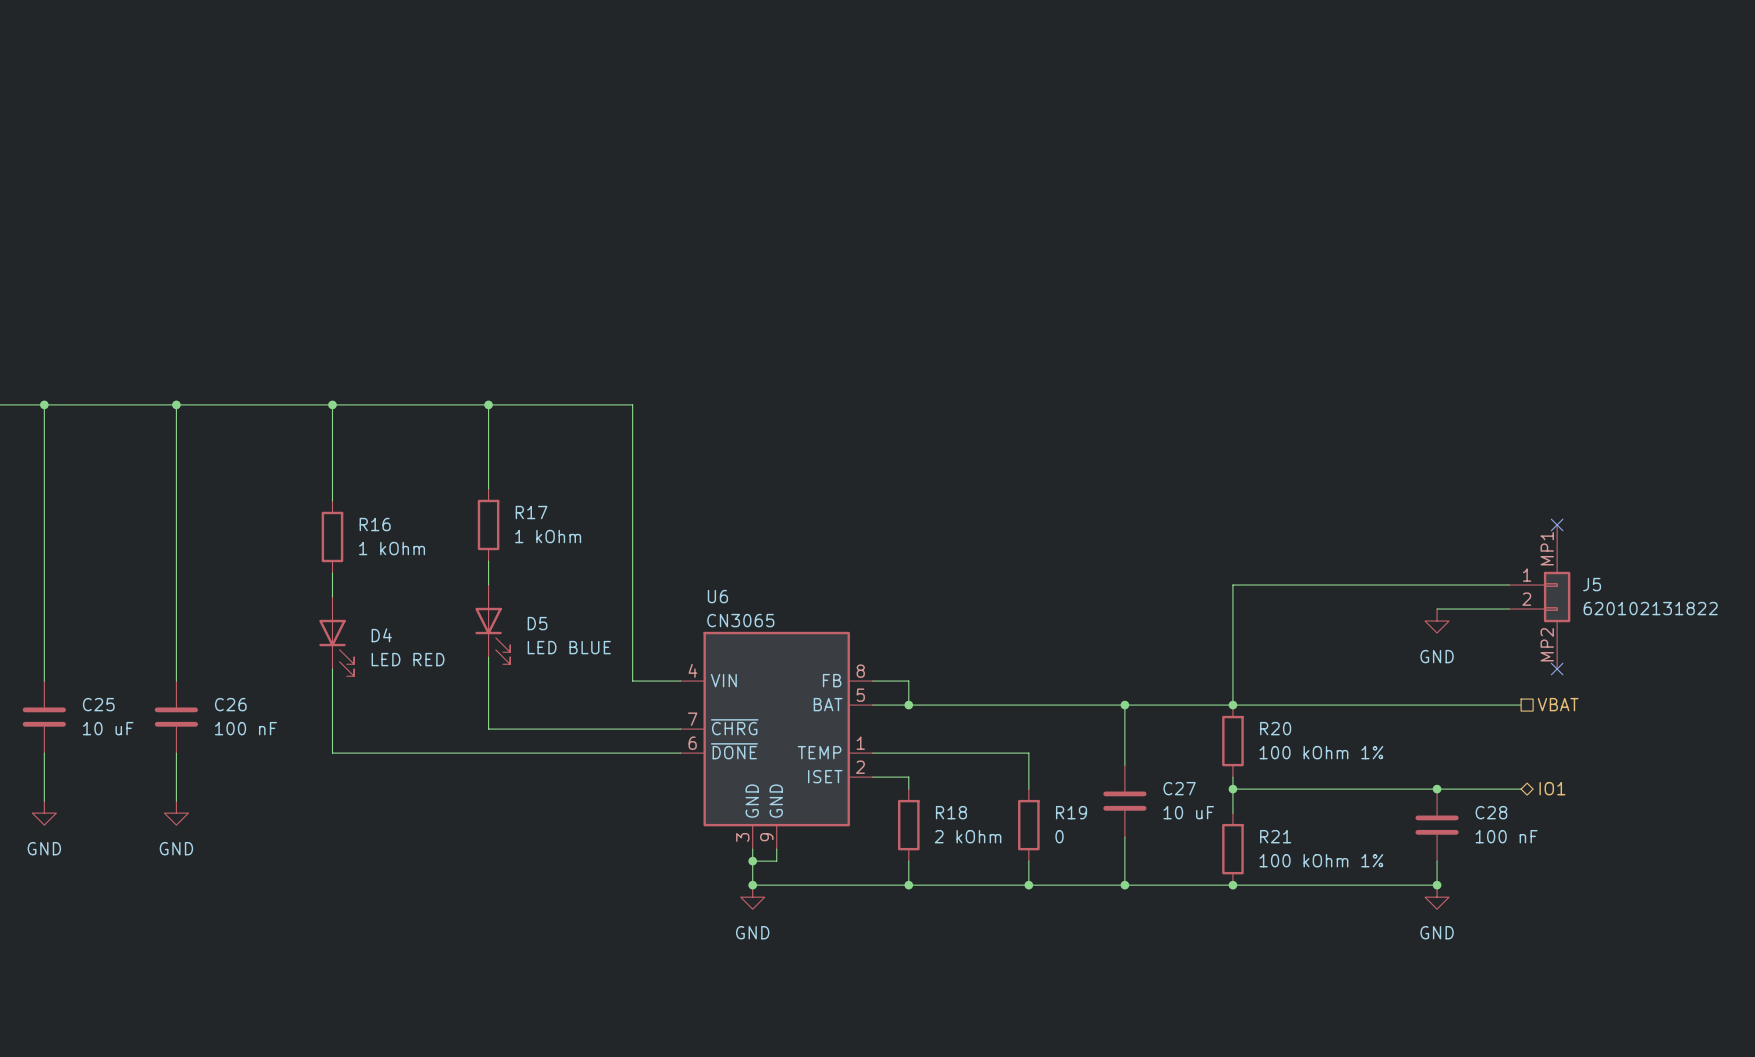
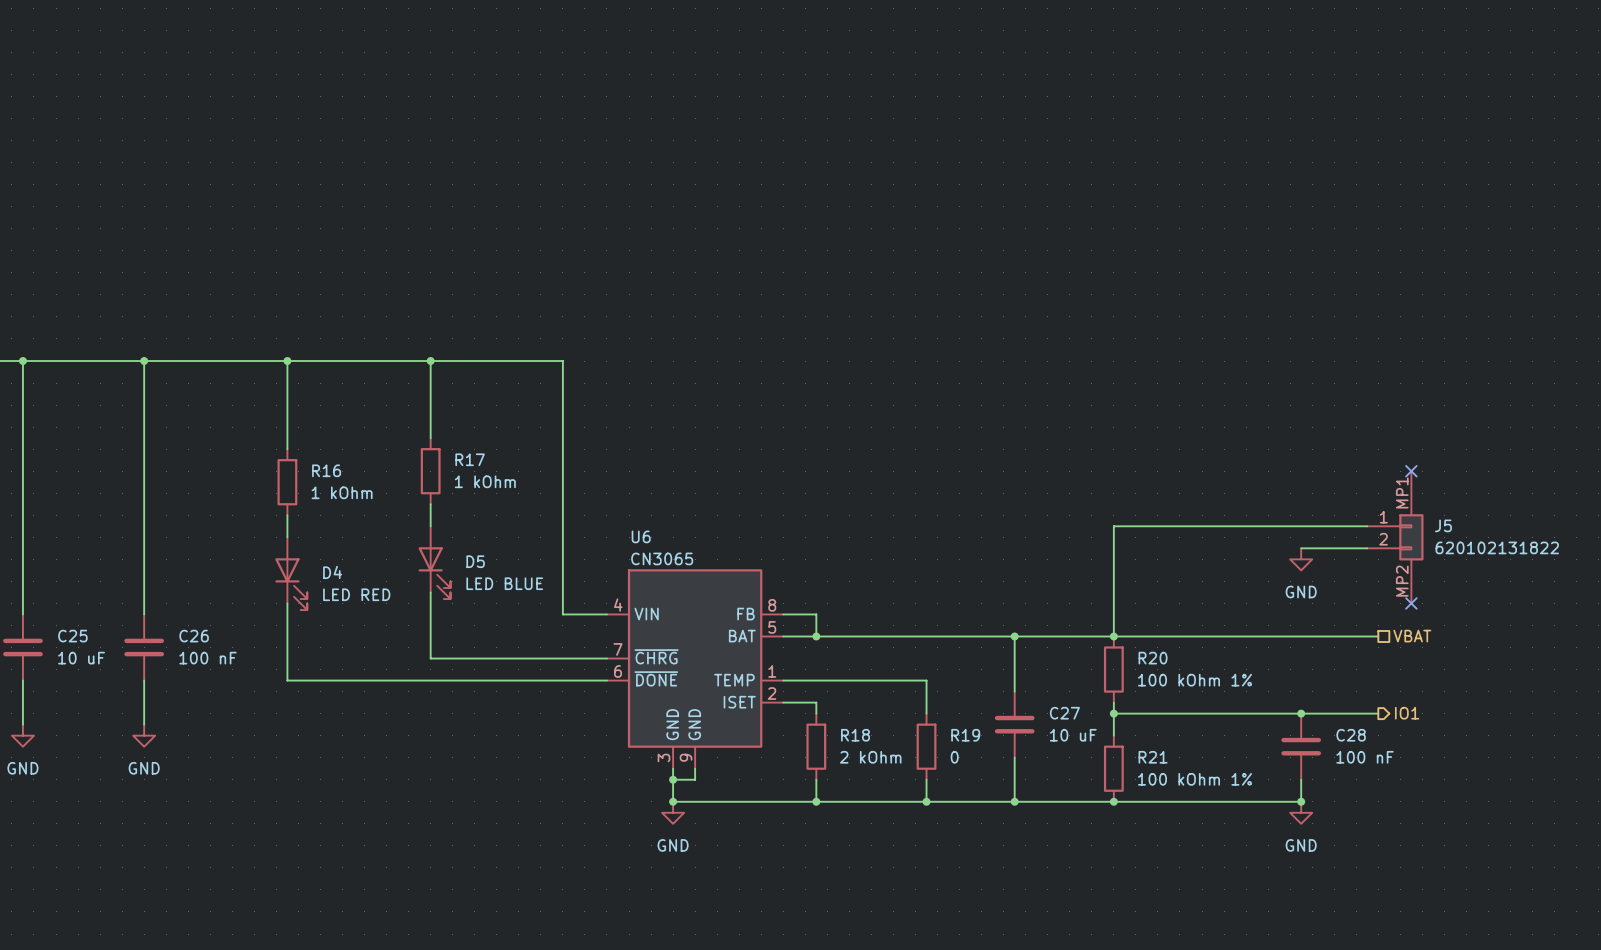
hierarchical label shape: bidirectional (1552, 788) -> output (1407, 713)

